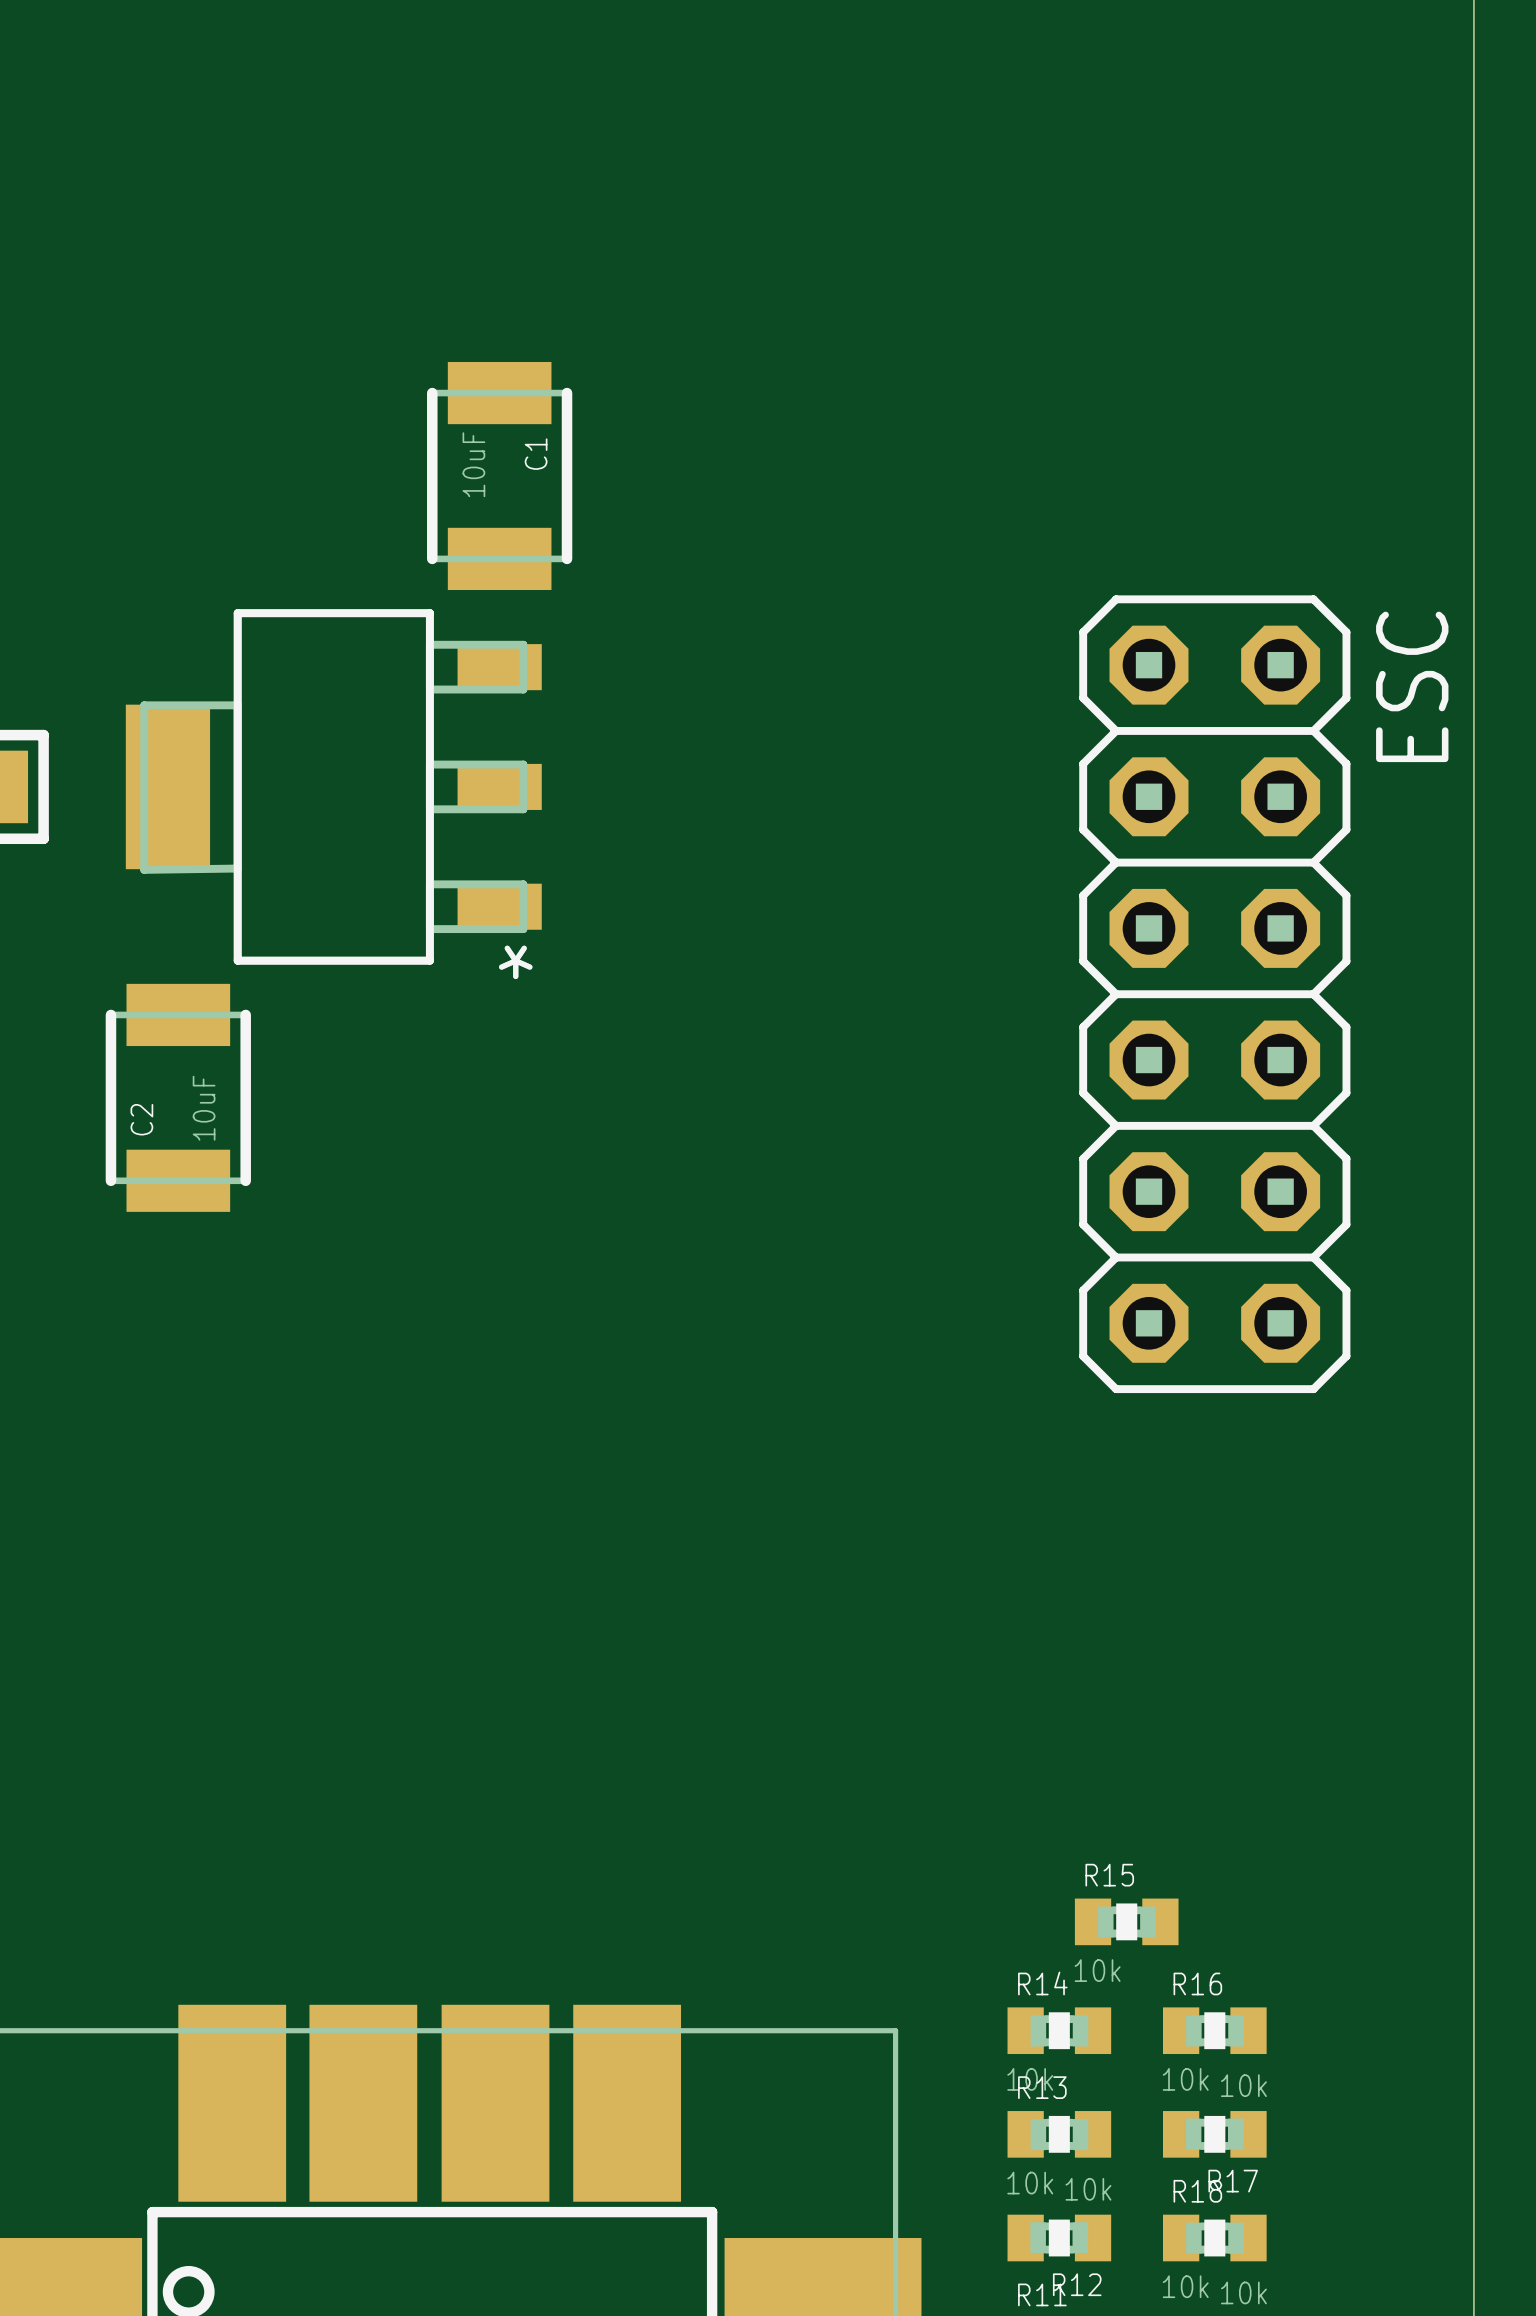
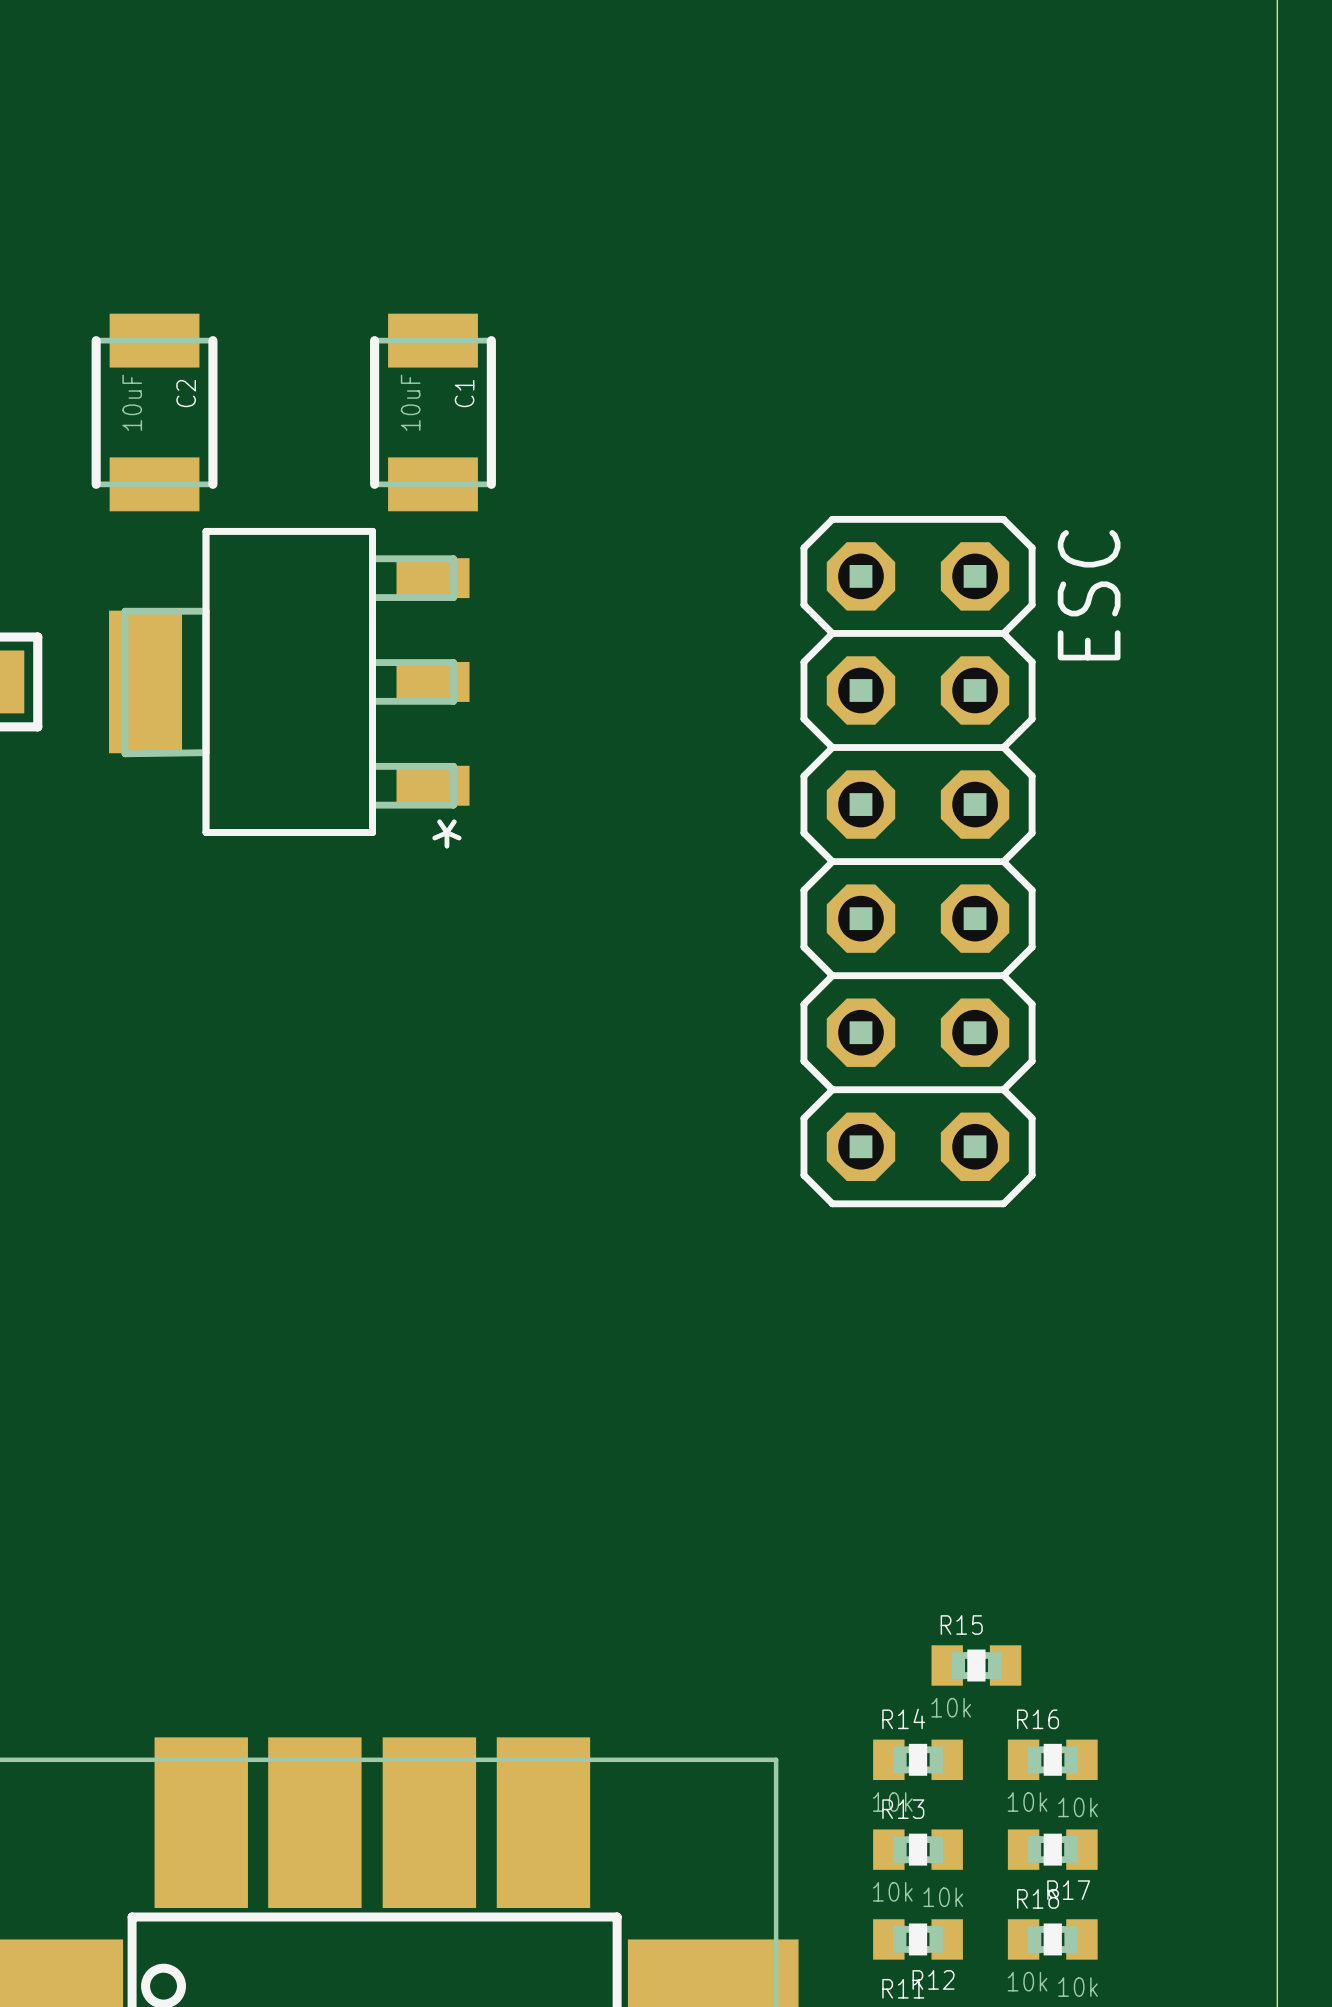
ESC position: (1214, 994) -> (918, 861)
C2 position: (178, 1097) -> (154, 412)
C2 value position: 10uF (204, 1108) -> 10uF (132, 402)
C2 name position: C2 (141, 1119) -> C2 (186, 393)

